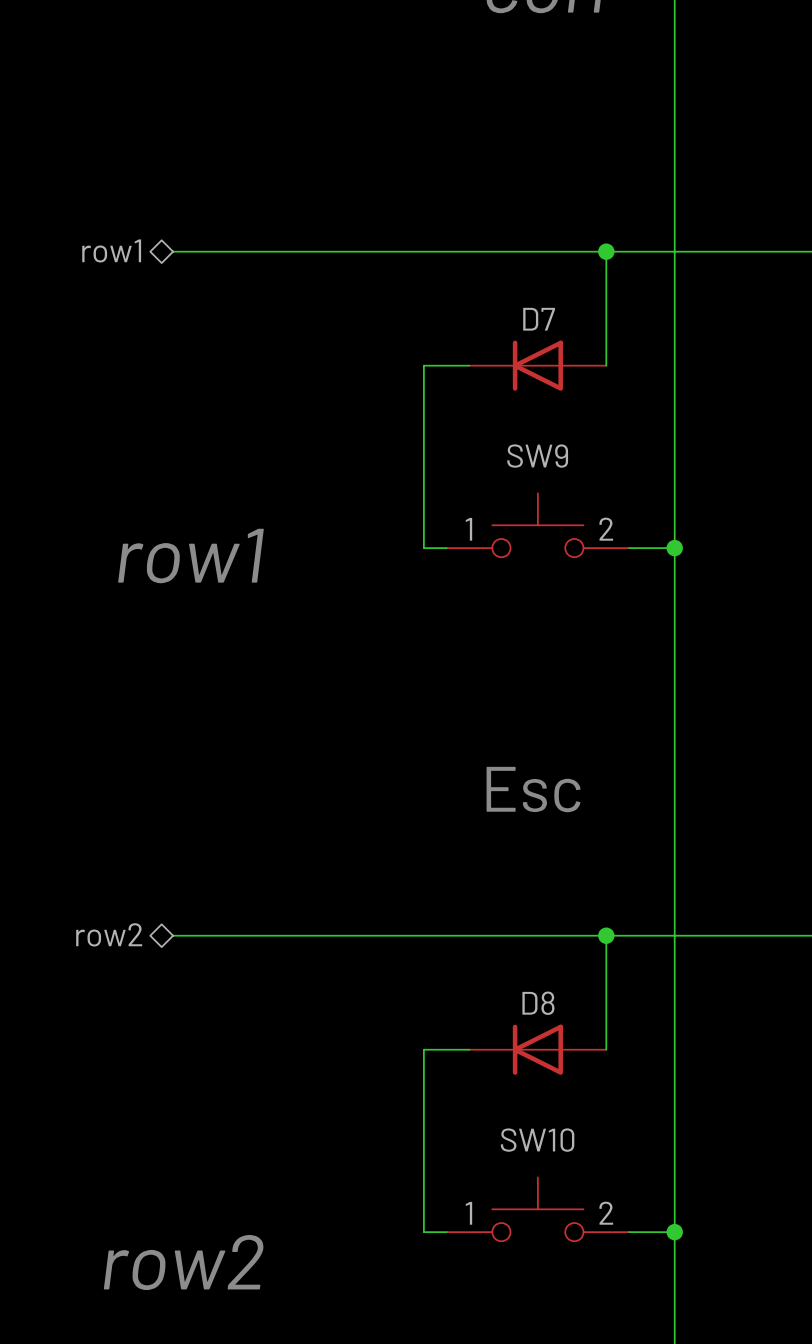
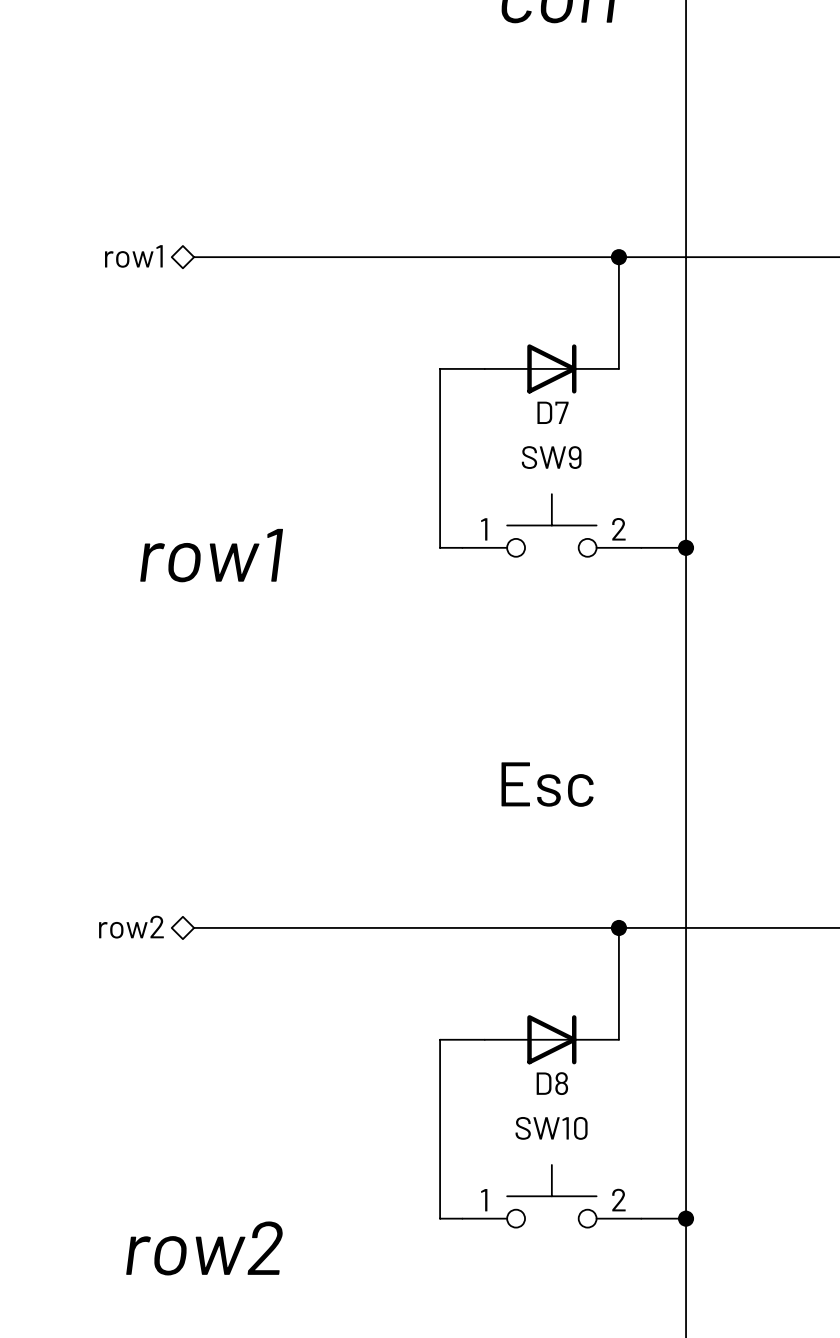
D7 rotation: 0° (537, 365) -> 180° (551, 368)
D8 rotation: 0° (537, 1049) -> 180° (551, 1039)

